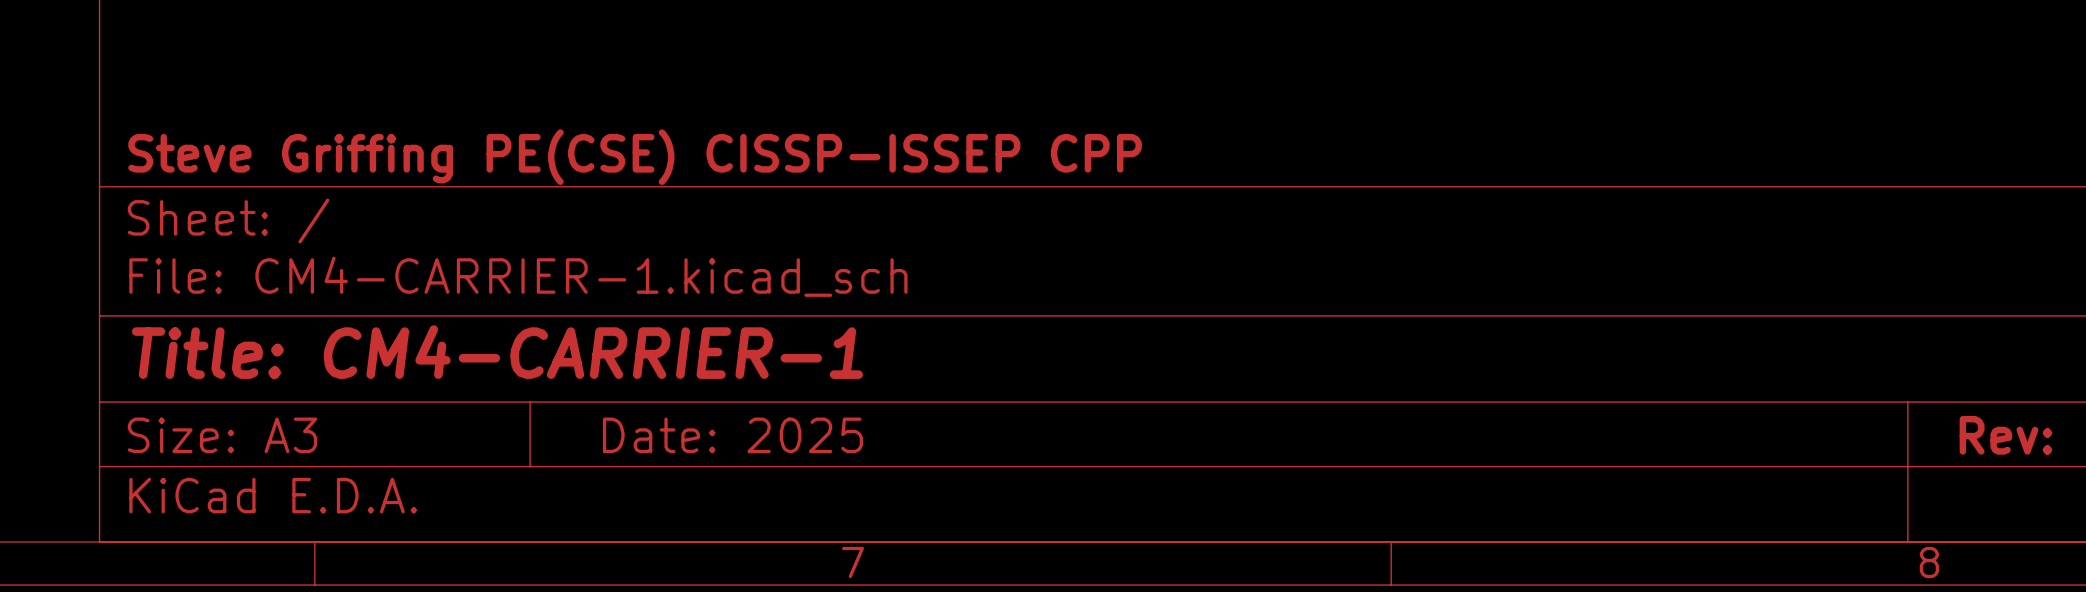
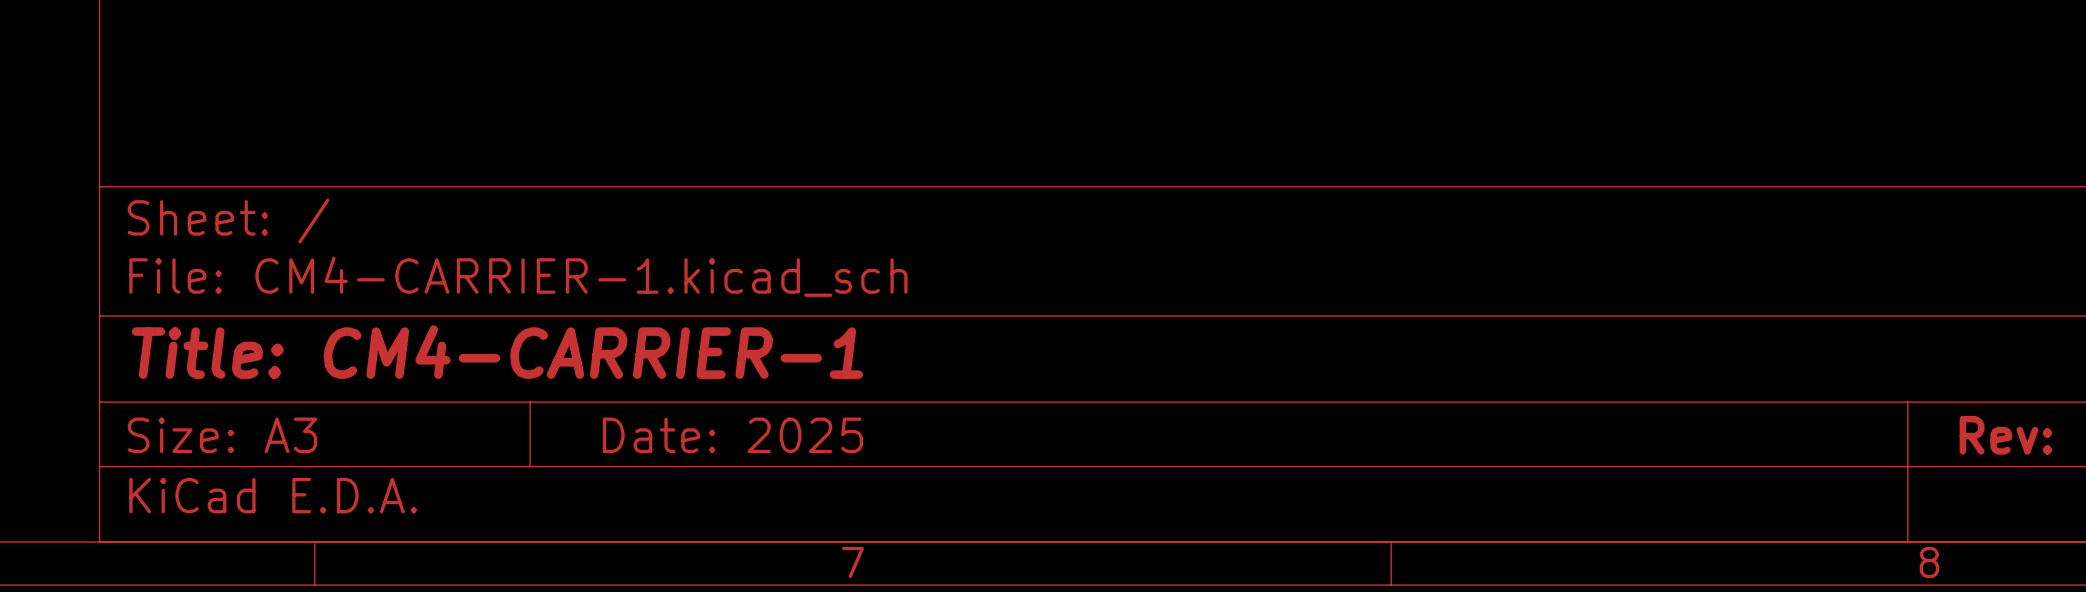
title block: Steve Griffing PE(CSE) CISSP-ISSEP CPP (635, 157) -> none

